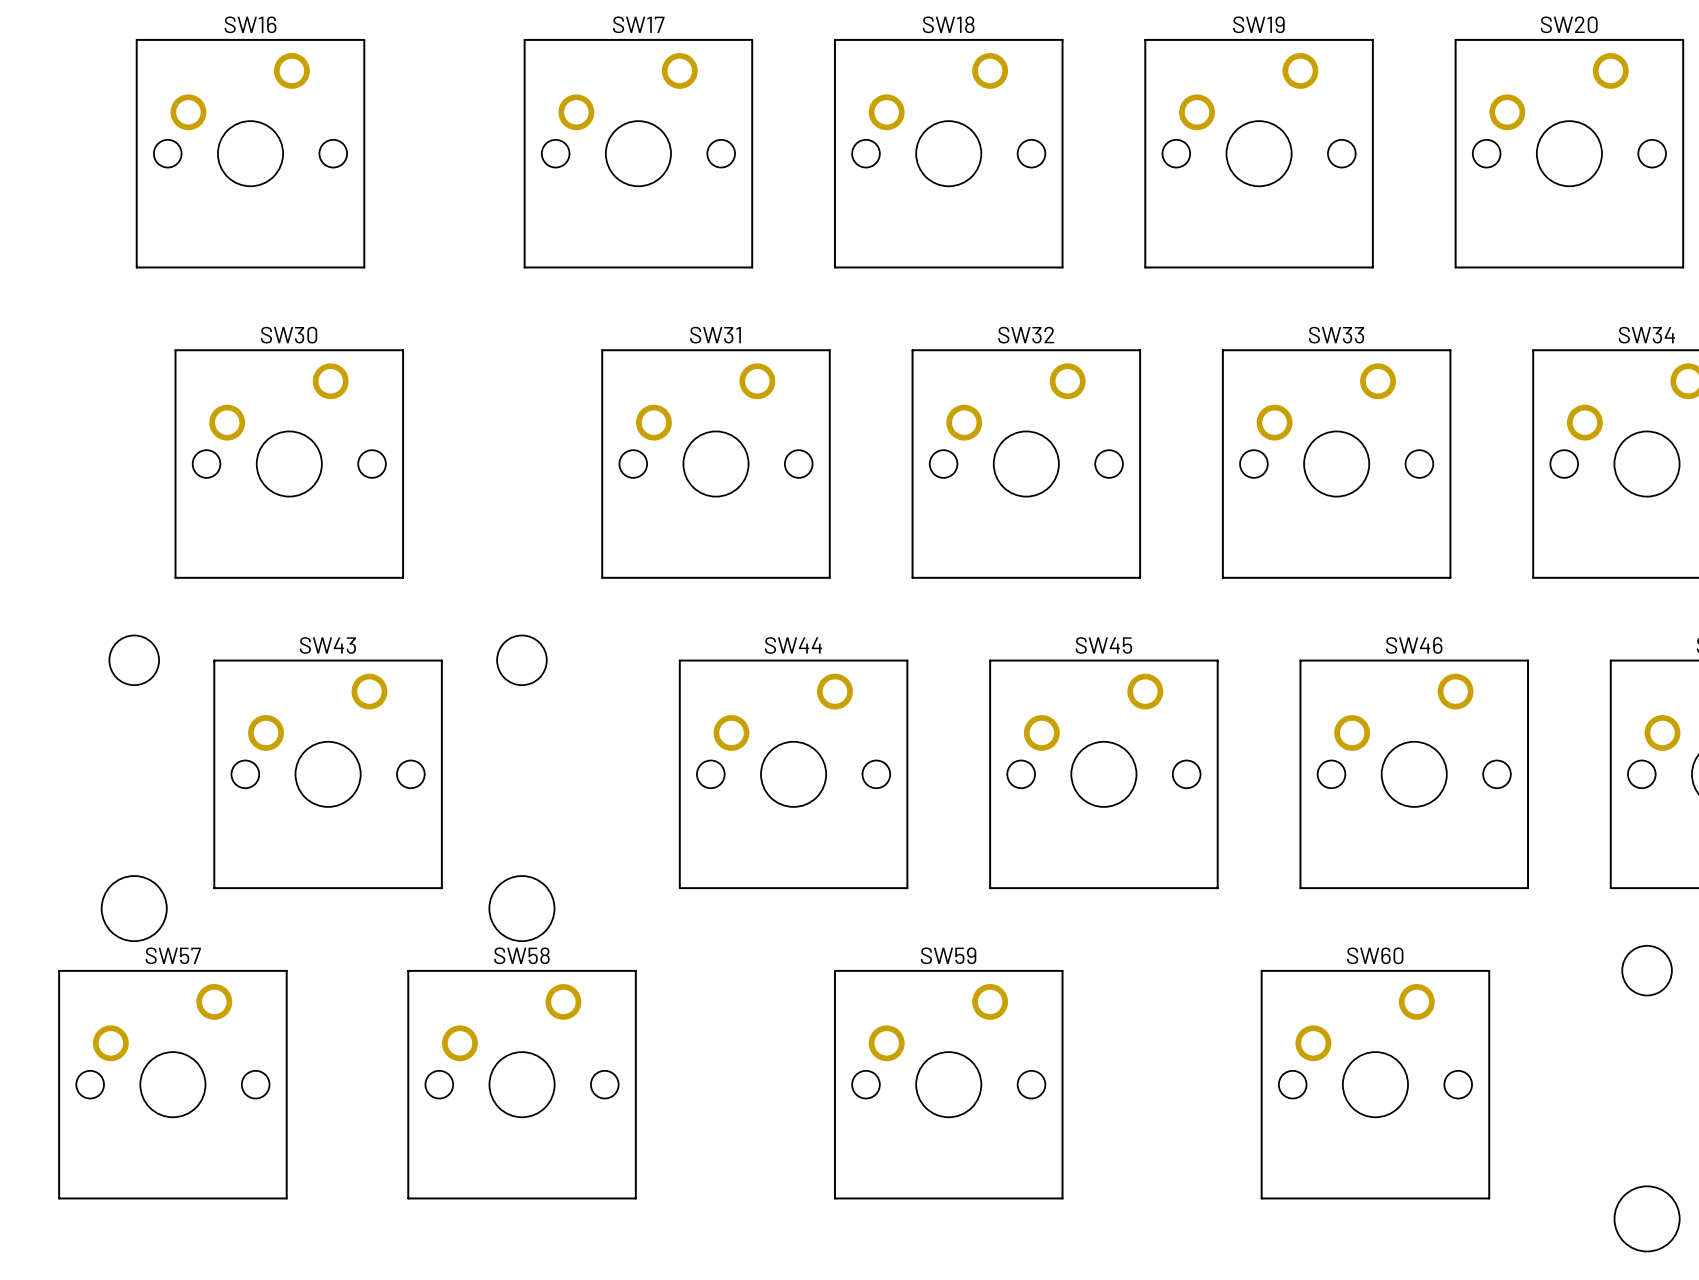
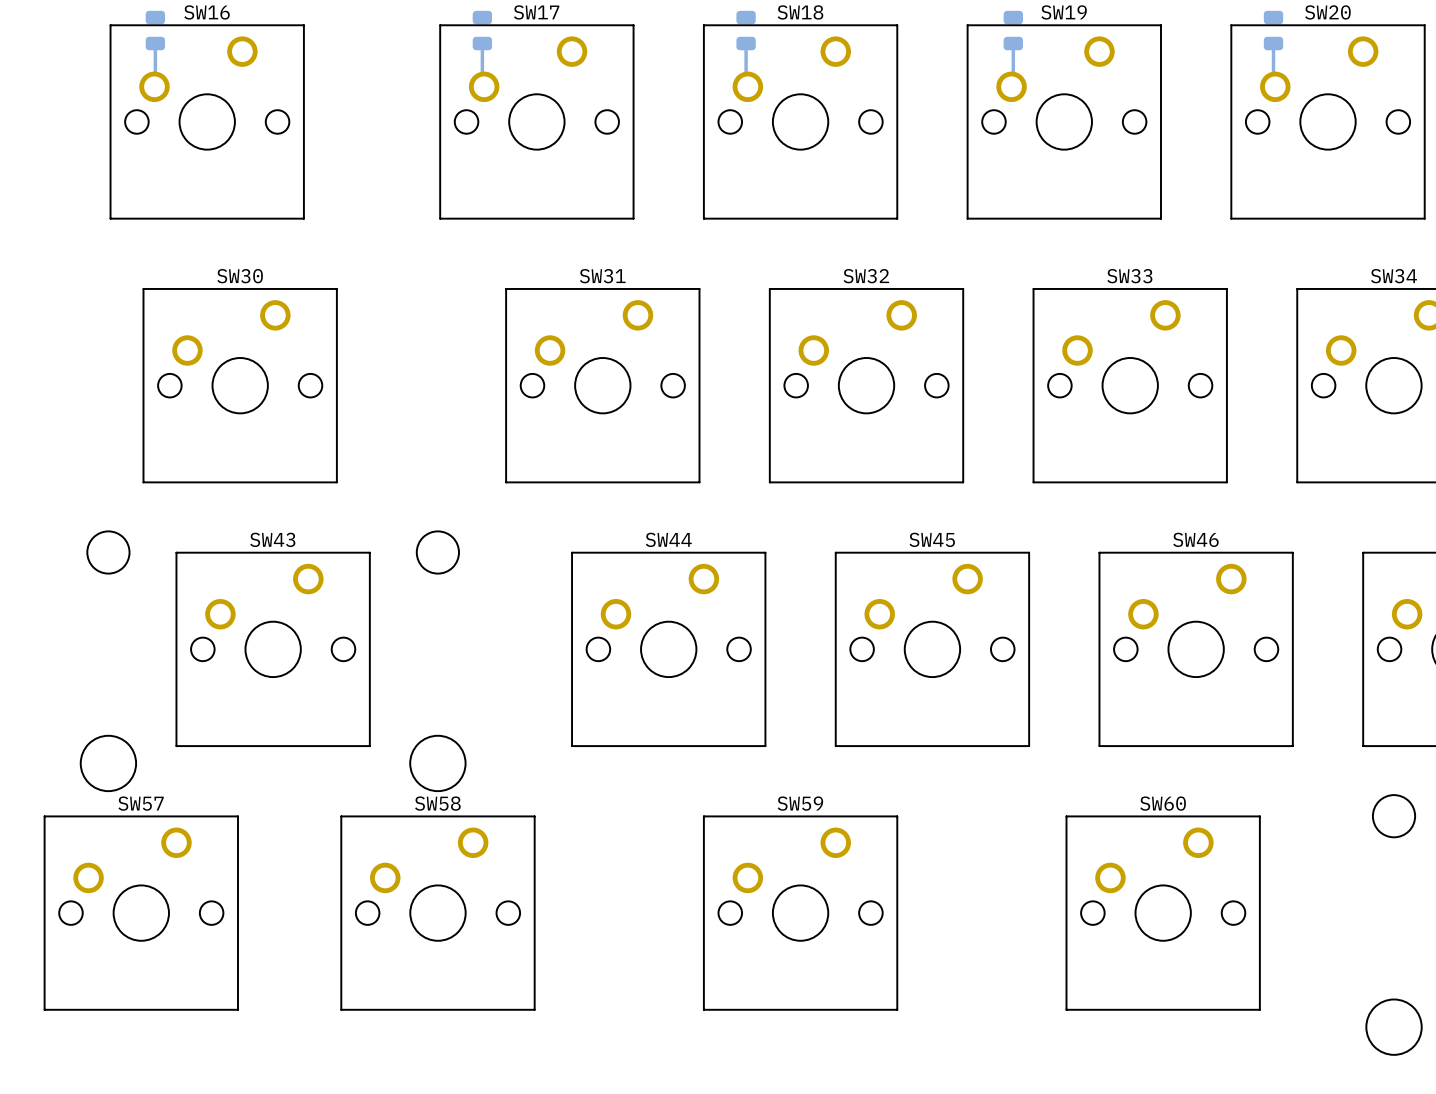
part: none -> (155, 30)
part: none -> (482, 30)
part: none -> (746, 30)
part: none -> (1013, 30)
part: none -> (1273, 30)
bottom track: none -> (155, 43) (154, 86)
bottom track: none -> (482, 43) (482, 85) (484, 86)
bottom track: none -> (746, 43) (746, 85) (747, 86)
bottom track: none -> (1013, 43) (1013, 85) (1011, 86)
bottom track: none -> (1273, 43) (1273, 85) (1275, 86)

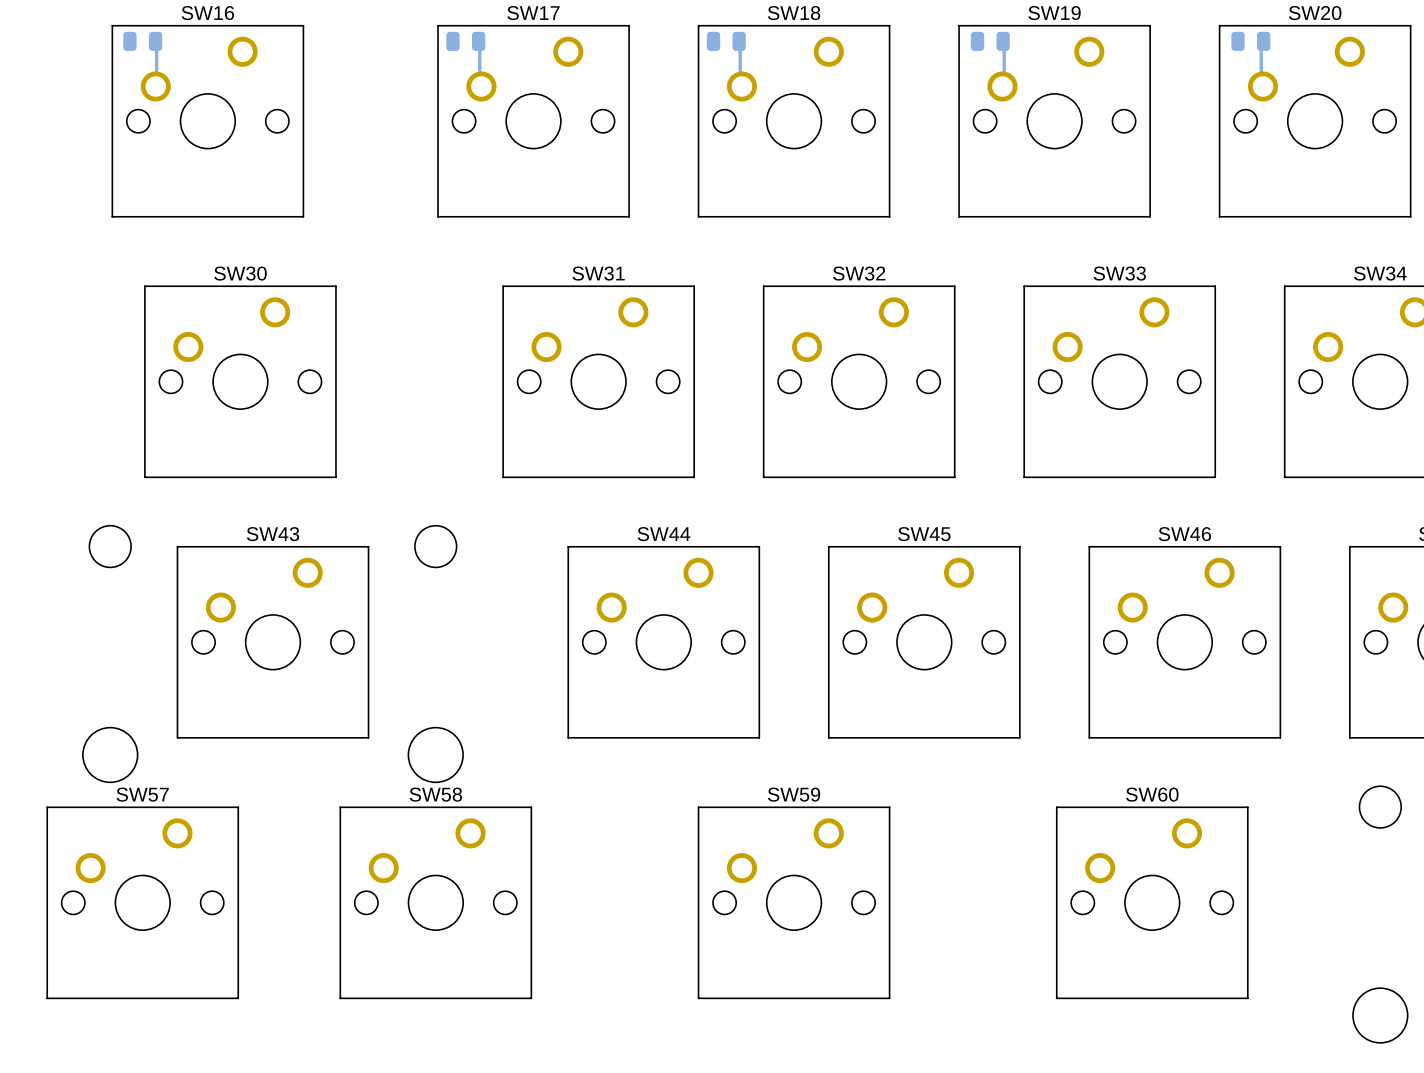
part rotation: 0° (155, 30) -> 90° clockwise (142, 41)
part rotation: 0° (482, 30) -> 90° clockwise (465, 41)
part rotation: 0° (746, 30) -> 90° clockwise (726, 41)
part rotation: 0° (1013, 30) -> 90° clockwise (990, 41)
part rotation: 0° (1273, 30) -> 90° clockwise (1250, 41)

